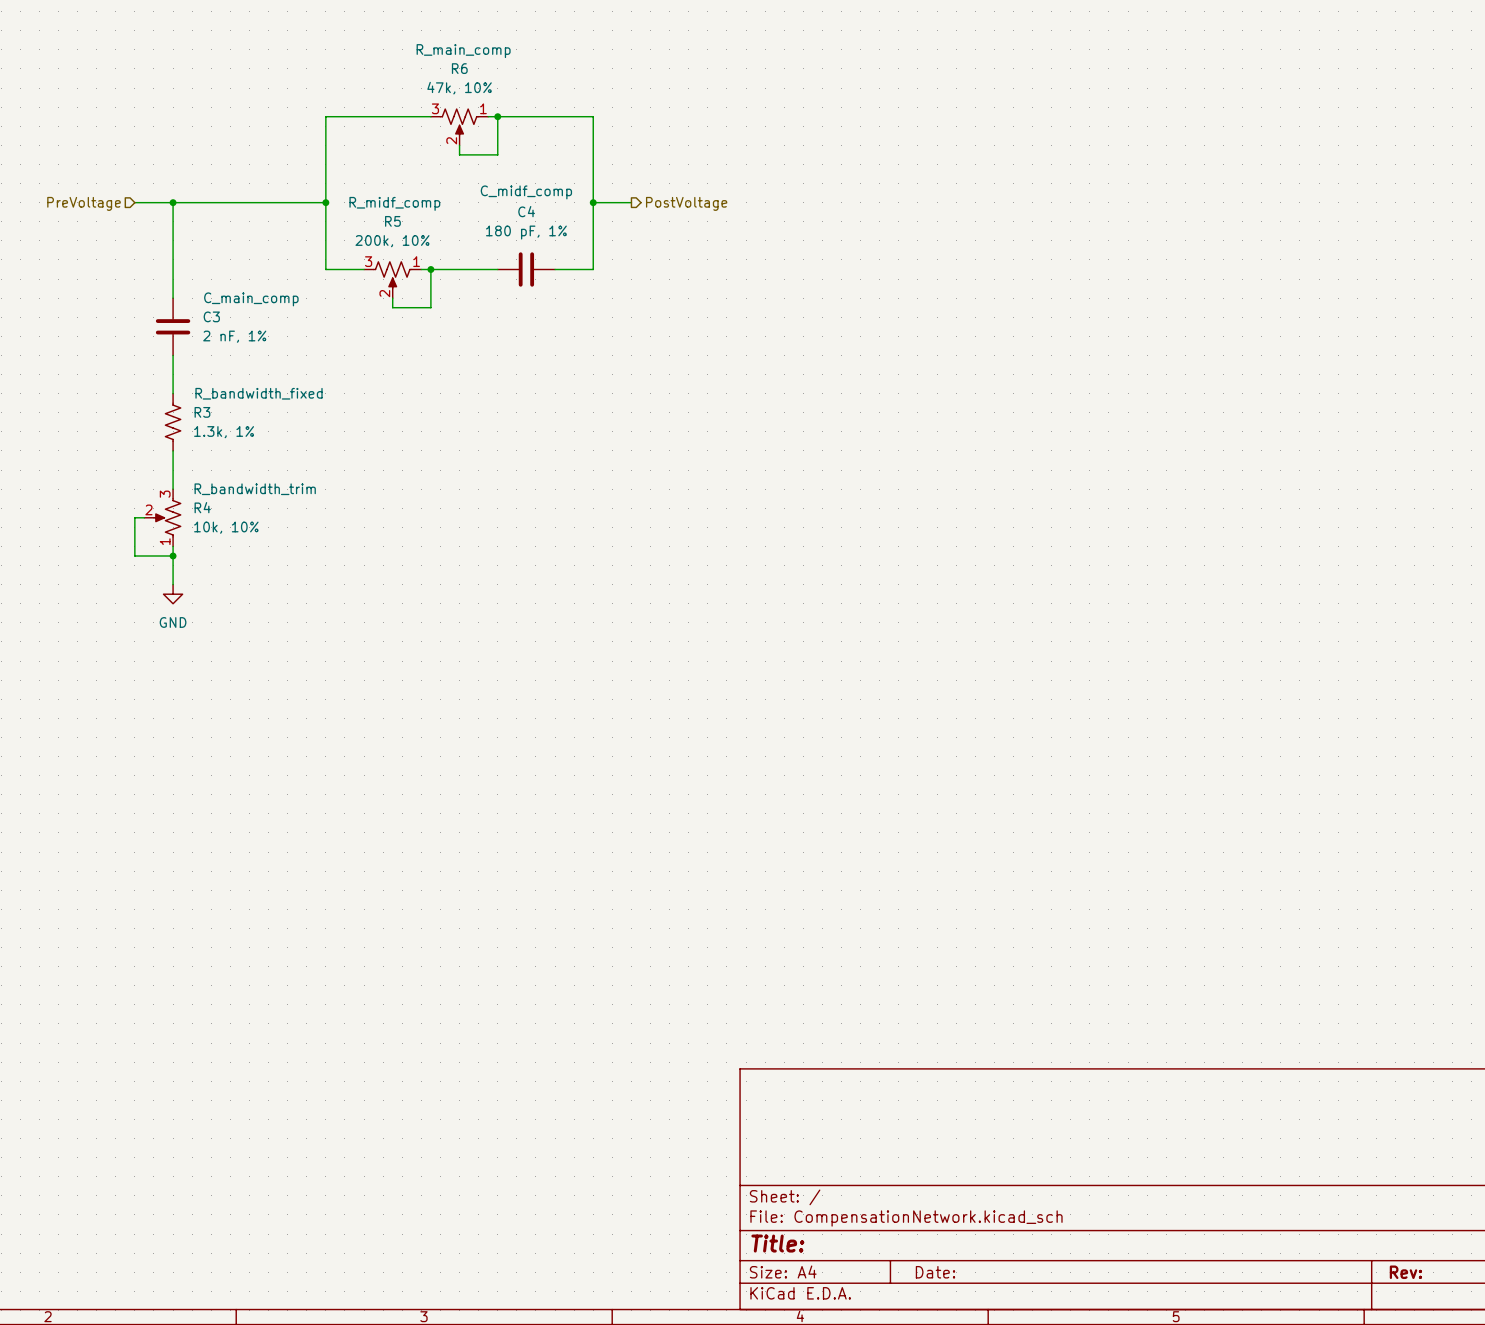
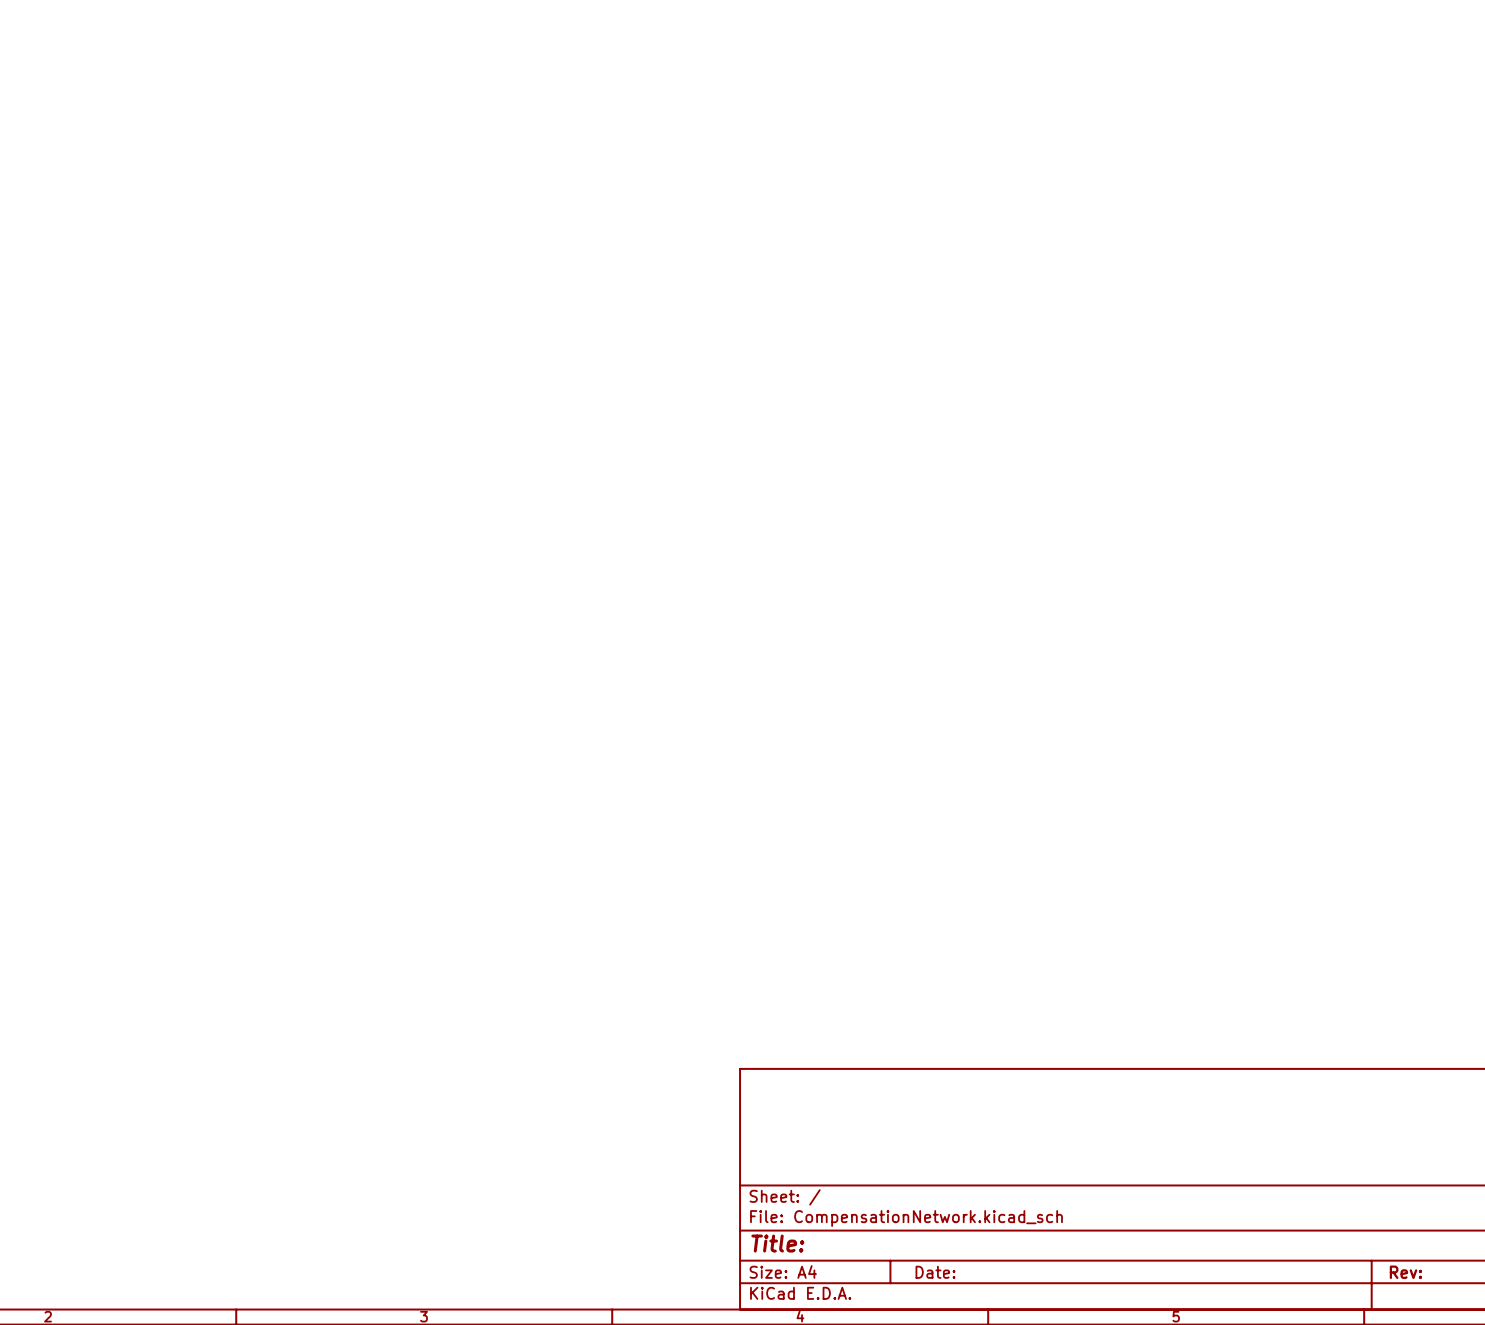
wire: (430, 116) (325, 116) (325, 269) (364, 269) -> none
wire: (488, 116) (593, 116) (593, 269) (555, 269) -> none
wire: (497, 116) (497, 154) (459, 154) (459, 145) -> none
junction: (497, 116) -> none
R6: 47k, 10% (459, 127) -> none
wire: (134, 202) (325, 202) -> none
wire: (173, 202) (173, 298) -> none
junction: (173, 202) -> none
junction: (325, 202) -> none
wire: (593, 202) (631, 202) -> none
junction: (593, 202) -> none
hierarchical label: PreVoltage (84, 203) -> none
hierarchical label: PostVoltage (686, 203) -> none
wire: (421, 269) (497, 269) -> none
wire: (430, 269) (430, 307) (392, 307) (392, 298) -> none
junction: (430, 269) -> none
C4: 180 pF, 1% (526, 269) -> none
R5: 200k, 10% (392, 280) -> none
C3: 2 nF, 1% (173, 326) -> none
wire: (173, 355) (173, 393) -> none
R3: 1.3k, 1% (173, 422) -> none
wire: (173, 450) (173, 489) -> none
wire: (144, 517) (134, 517) (134, 556) (173, 556) -> none
R4: 10k, 10% (162, 517) -> none
wire: (173, 546) (173, 584) -> none
junction: (173, 556) -> none
power symbol: GND (173, 594) -> none

